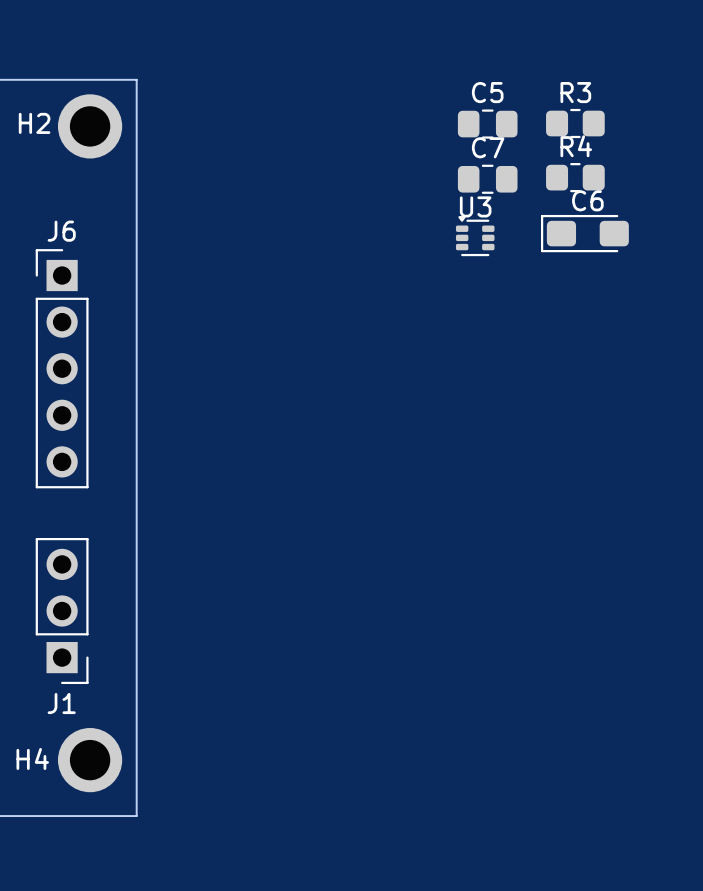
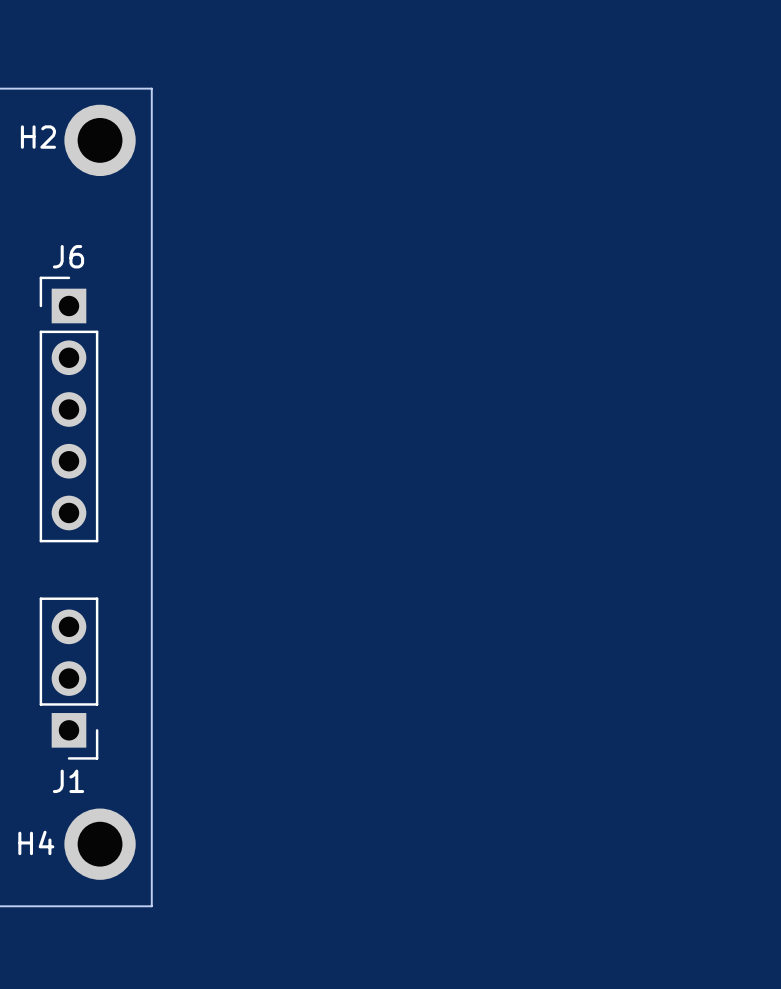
R3: (575, 123) -> none
C5: (487, 124) -> none
R4: (575, 177) -> none
C7: (487, 179) -> none
C6: (584, 233) -> none
U3: (475, 236) -> none

